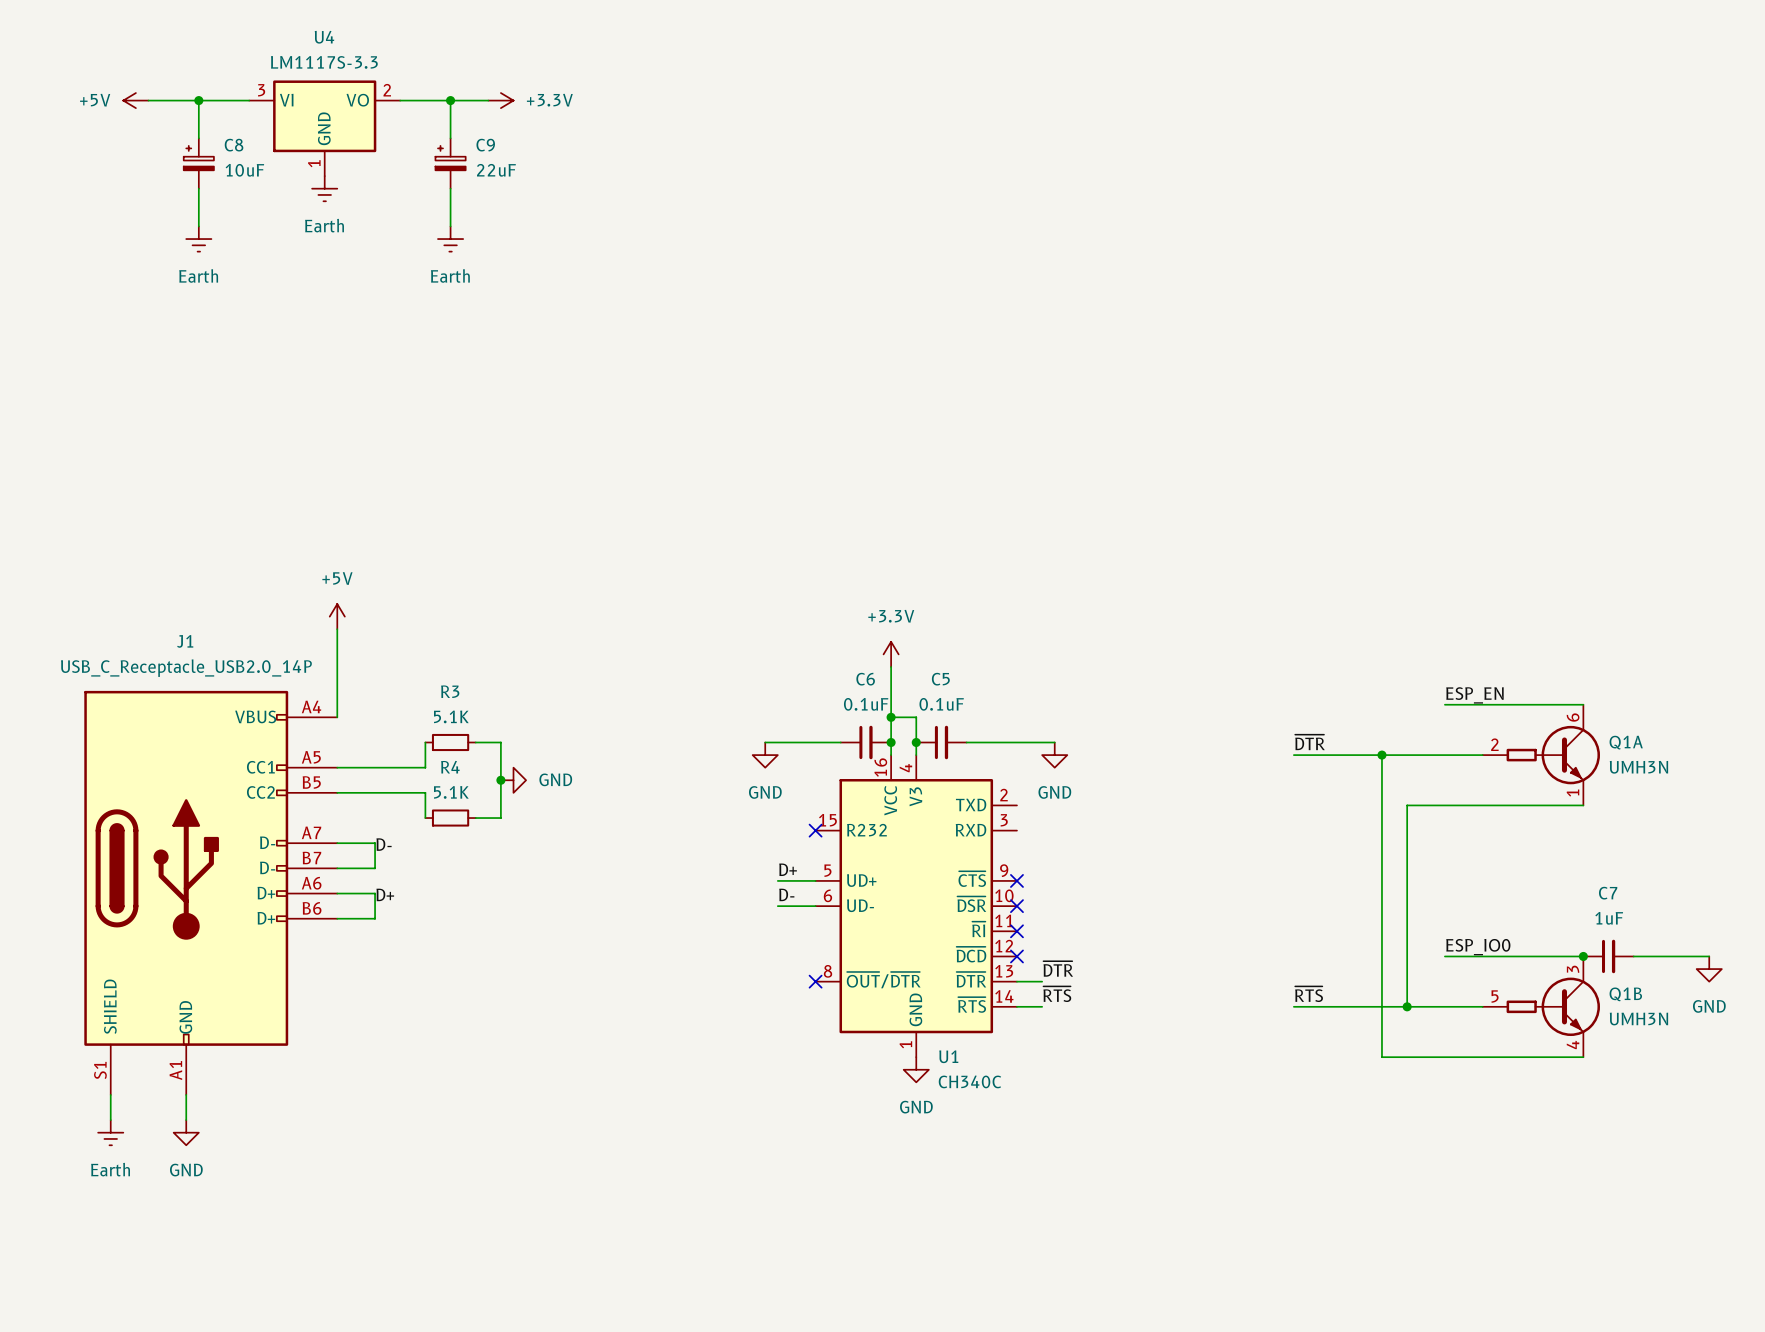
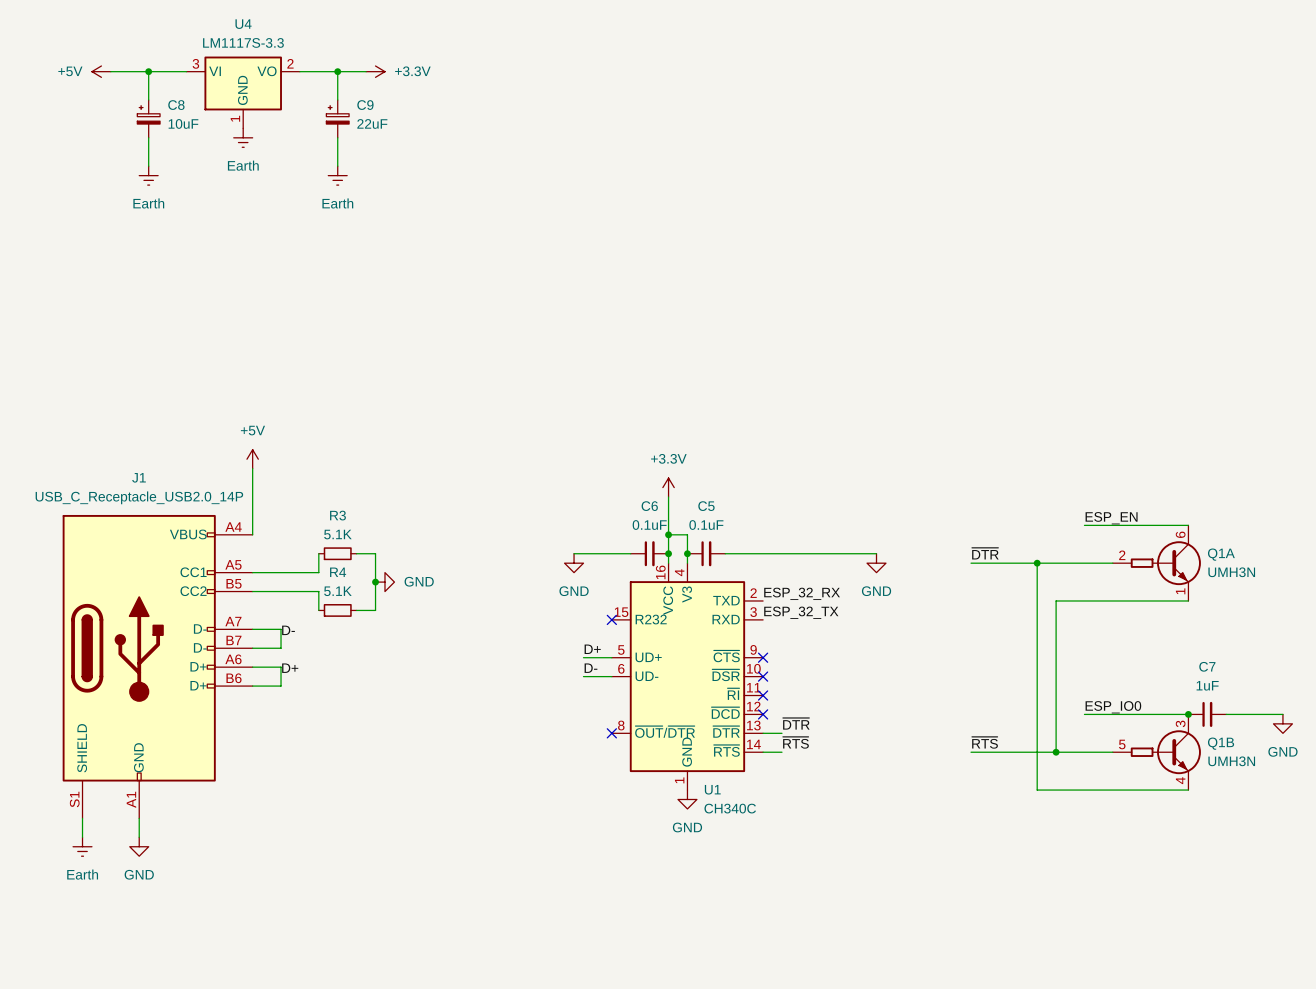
wire: none -> (791, 553) (876, 553)
power symbol position: GND (1054, 755) -> GND (876, 563)
label: none -> ESP_32_RX (802, 593)
label: none -> ESP_32_TX (801, 612)

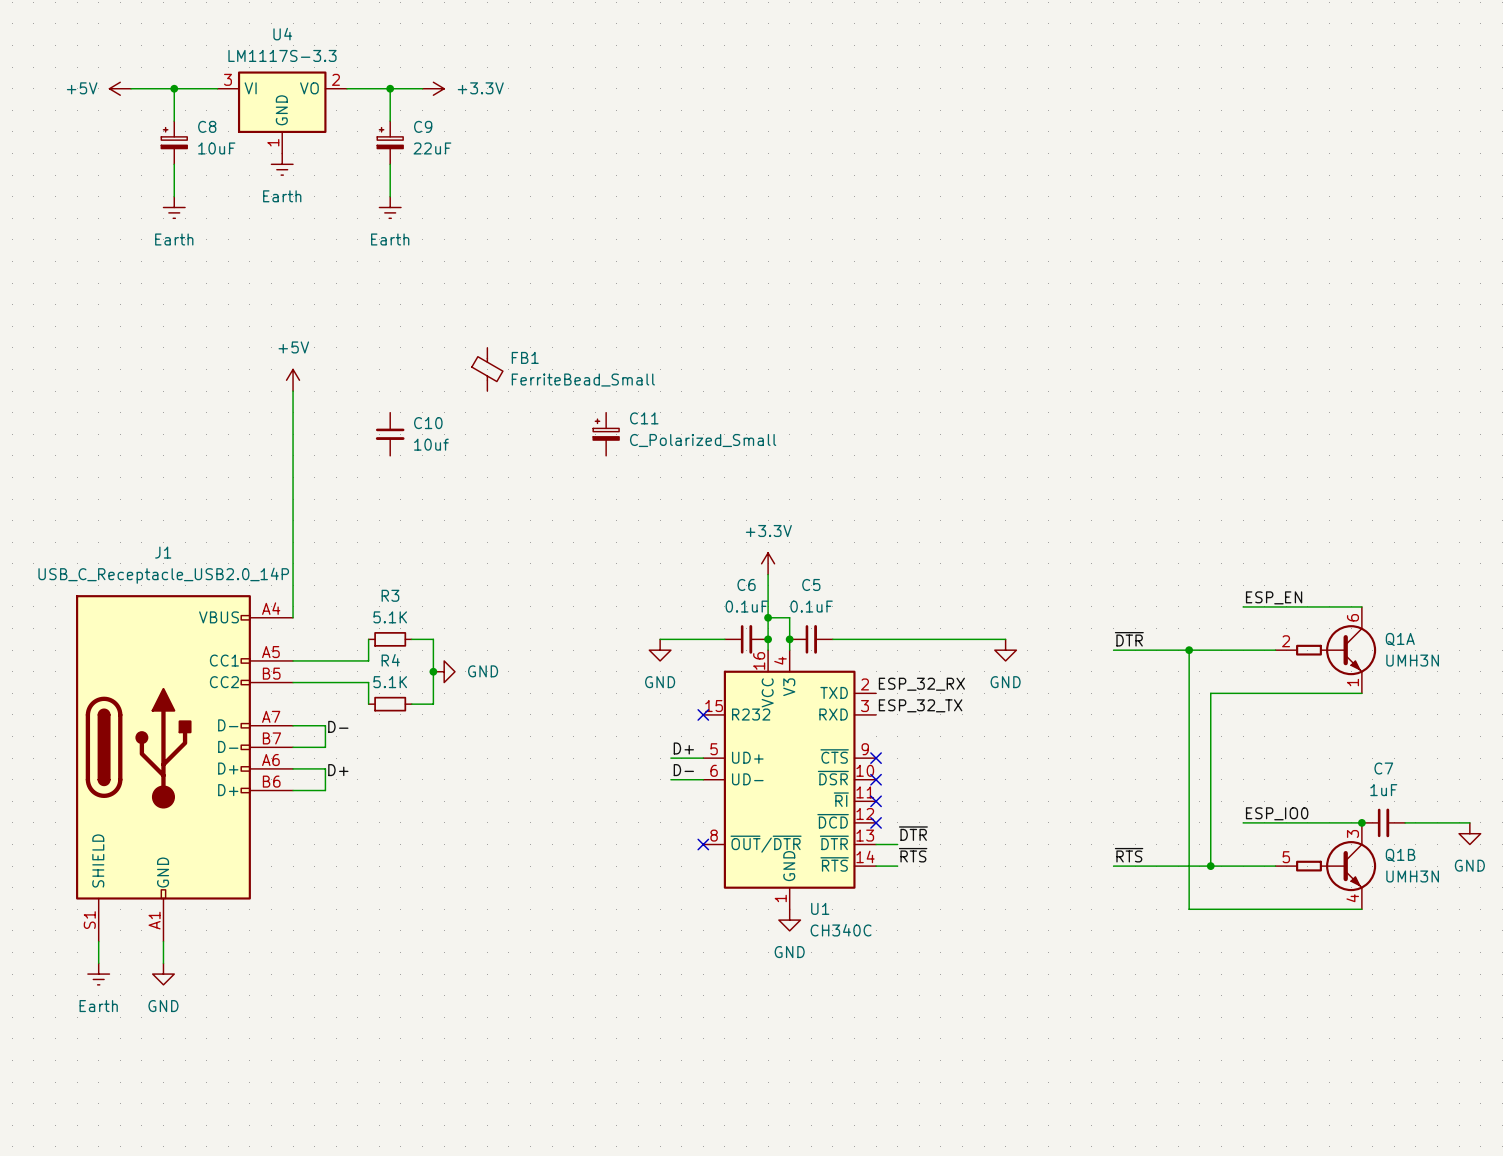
FB1: none -> FerriteBead_Small (487, 369)
wire: none -> (293, 391) (293, 542)
C10: none -> 10uf (390, 434)
C11: none -> C_Polarized_Small (606, 434)
power symbol position: +5V (252, 459) -> +5V (293, 380)

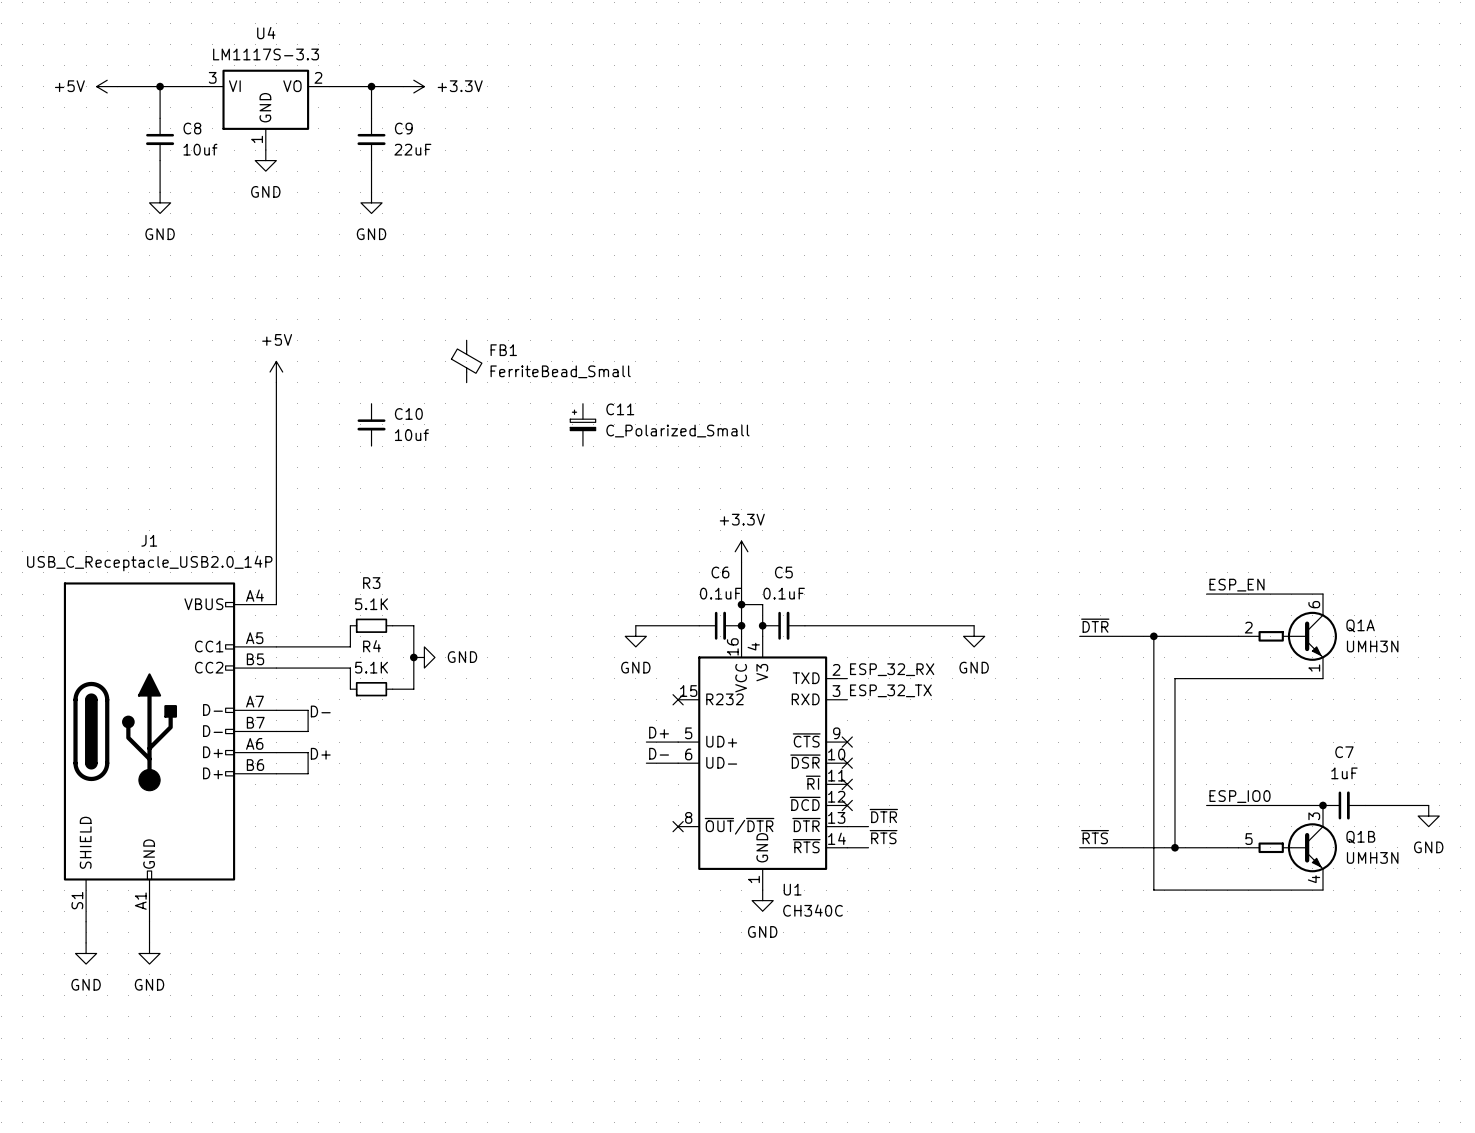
C8 symbol: [161, 121, 188, 165] -> [146, 118, 175, 161]
C9 symbol: [377, 121, 404, 165] -> [357, 118, 386, 161]
C8 value: 10uF (216, 148) -> 10uf (200, 149)
power symbol: Earth (282, 164) -> GND (265, 160)
power symbol: Earth (174, 207) -> GND (160, 202)
power symbol: Earth (390, 207) -> GND (371, 202)
power symbol: Earth (98, 974) -> GND (86, 953)

